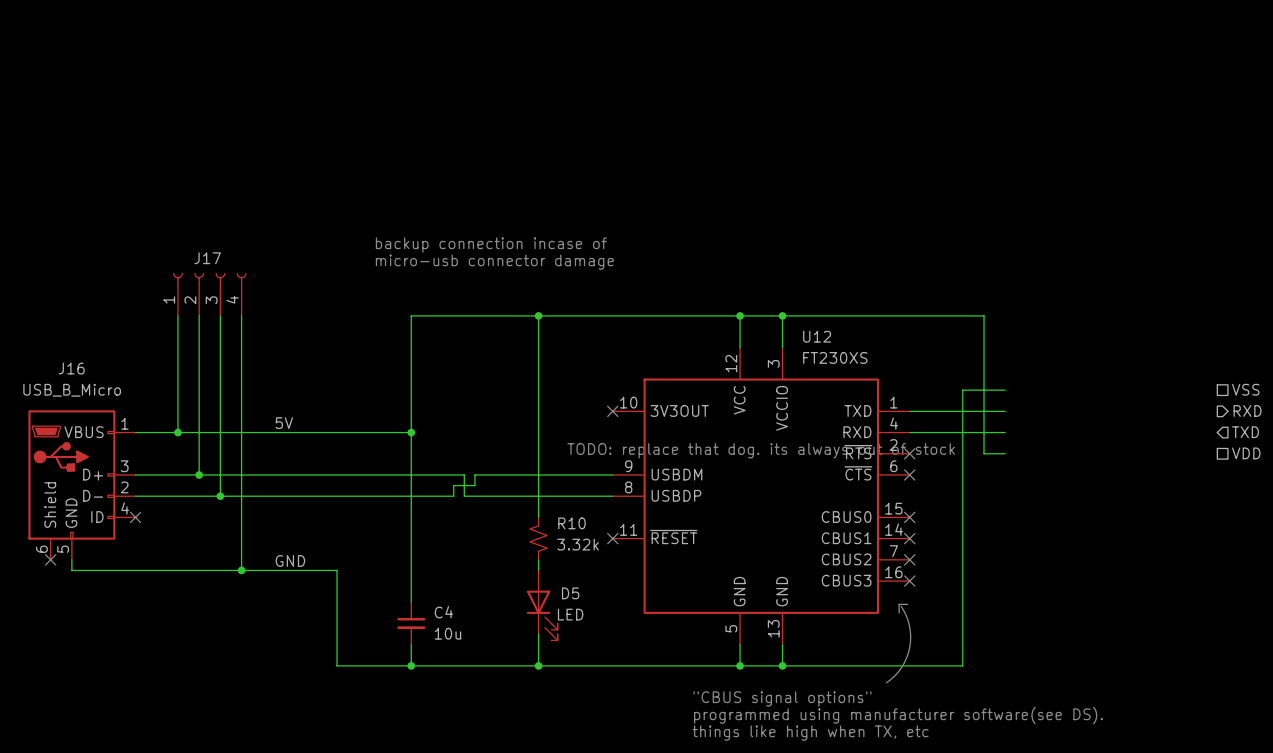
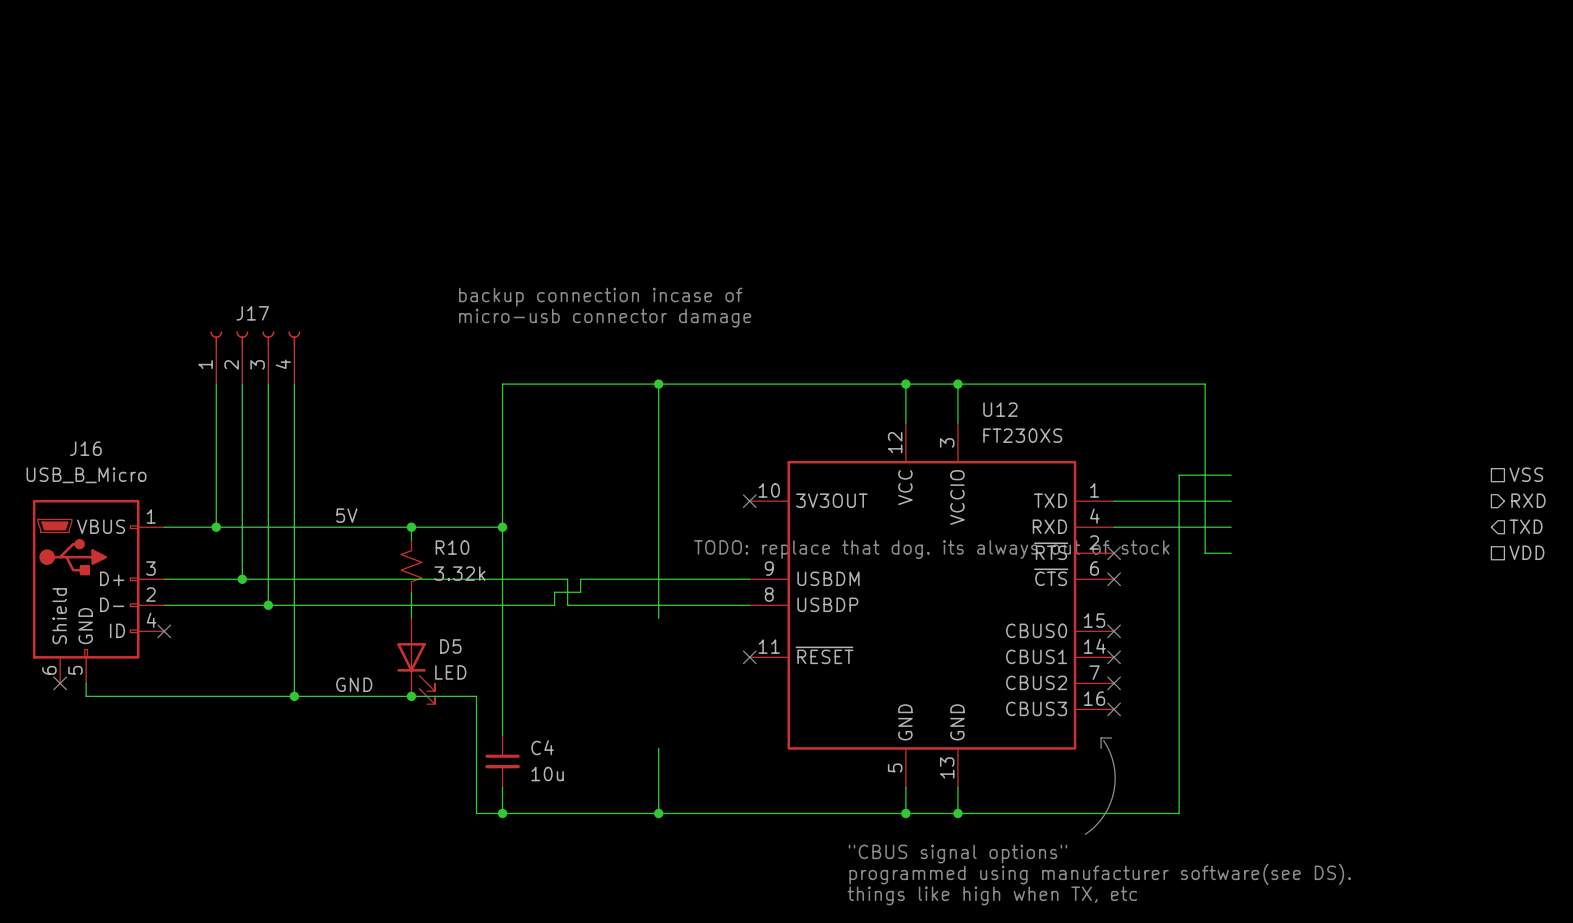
wire: none -> (411, 527) (411, 540)
junction: none -> (411, 527)
wire: none -> (411, 592) (411, 618)
wire: (538, 506) (538, 517) -> none
R10 position: (538, 538) -> (411, 566)
wire: (538, 559) (538, 570) -> none
wire: (337, 570) (337, 665) (390, 665) -> (411, 696) (476, 696) (476, 813)
junction: none -> (411, 696)
D5 position: (542, 605) -> (416, 661)

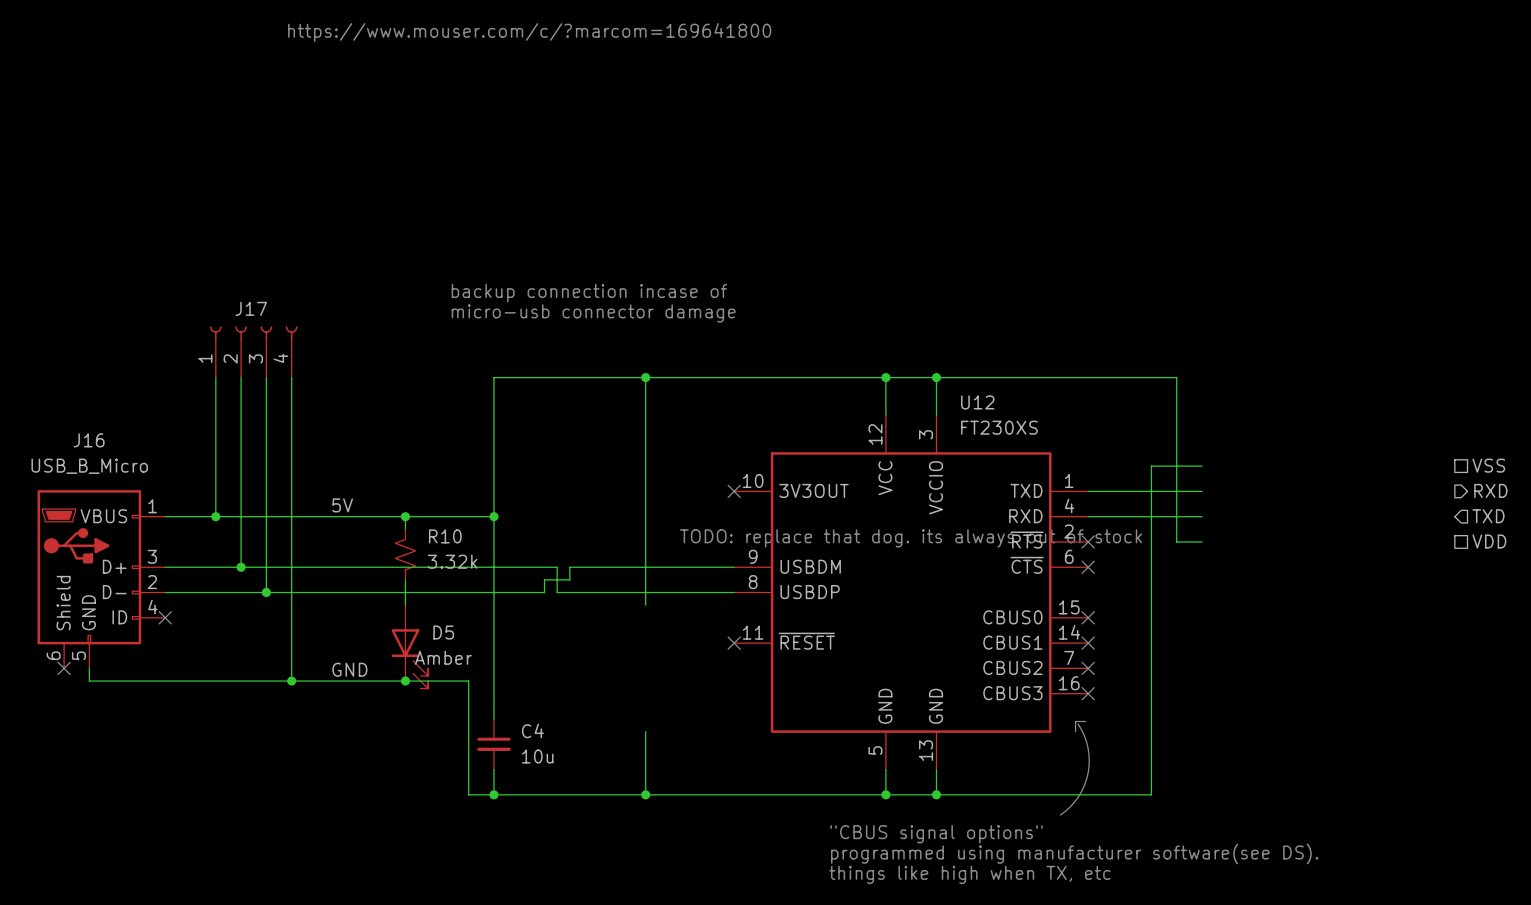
text: none -> https://www.mouser.com/c/?marcom=169641800 (529, 32)
D5 value: LED (450, 672) -> Amber (443, 657)

